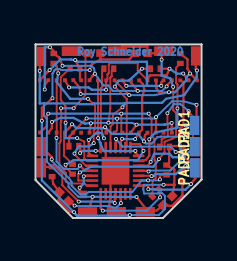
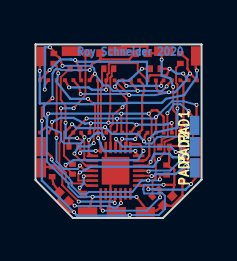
bottom track: none -> (48, 113) (46, 126) (61, 132) (61, 140) (64, 143) (81, 143) (84, 137)
top track: none -> (148, 113) (151, 110) (157, 110) (163, 116) (163, 132)
top track: none -> (81, 132) (84, 137)
via: none -> (84, 137)

